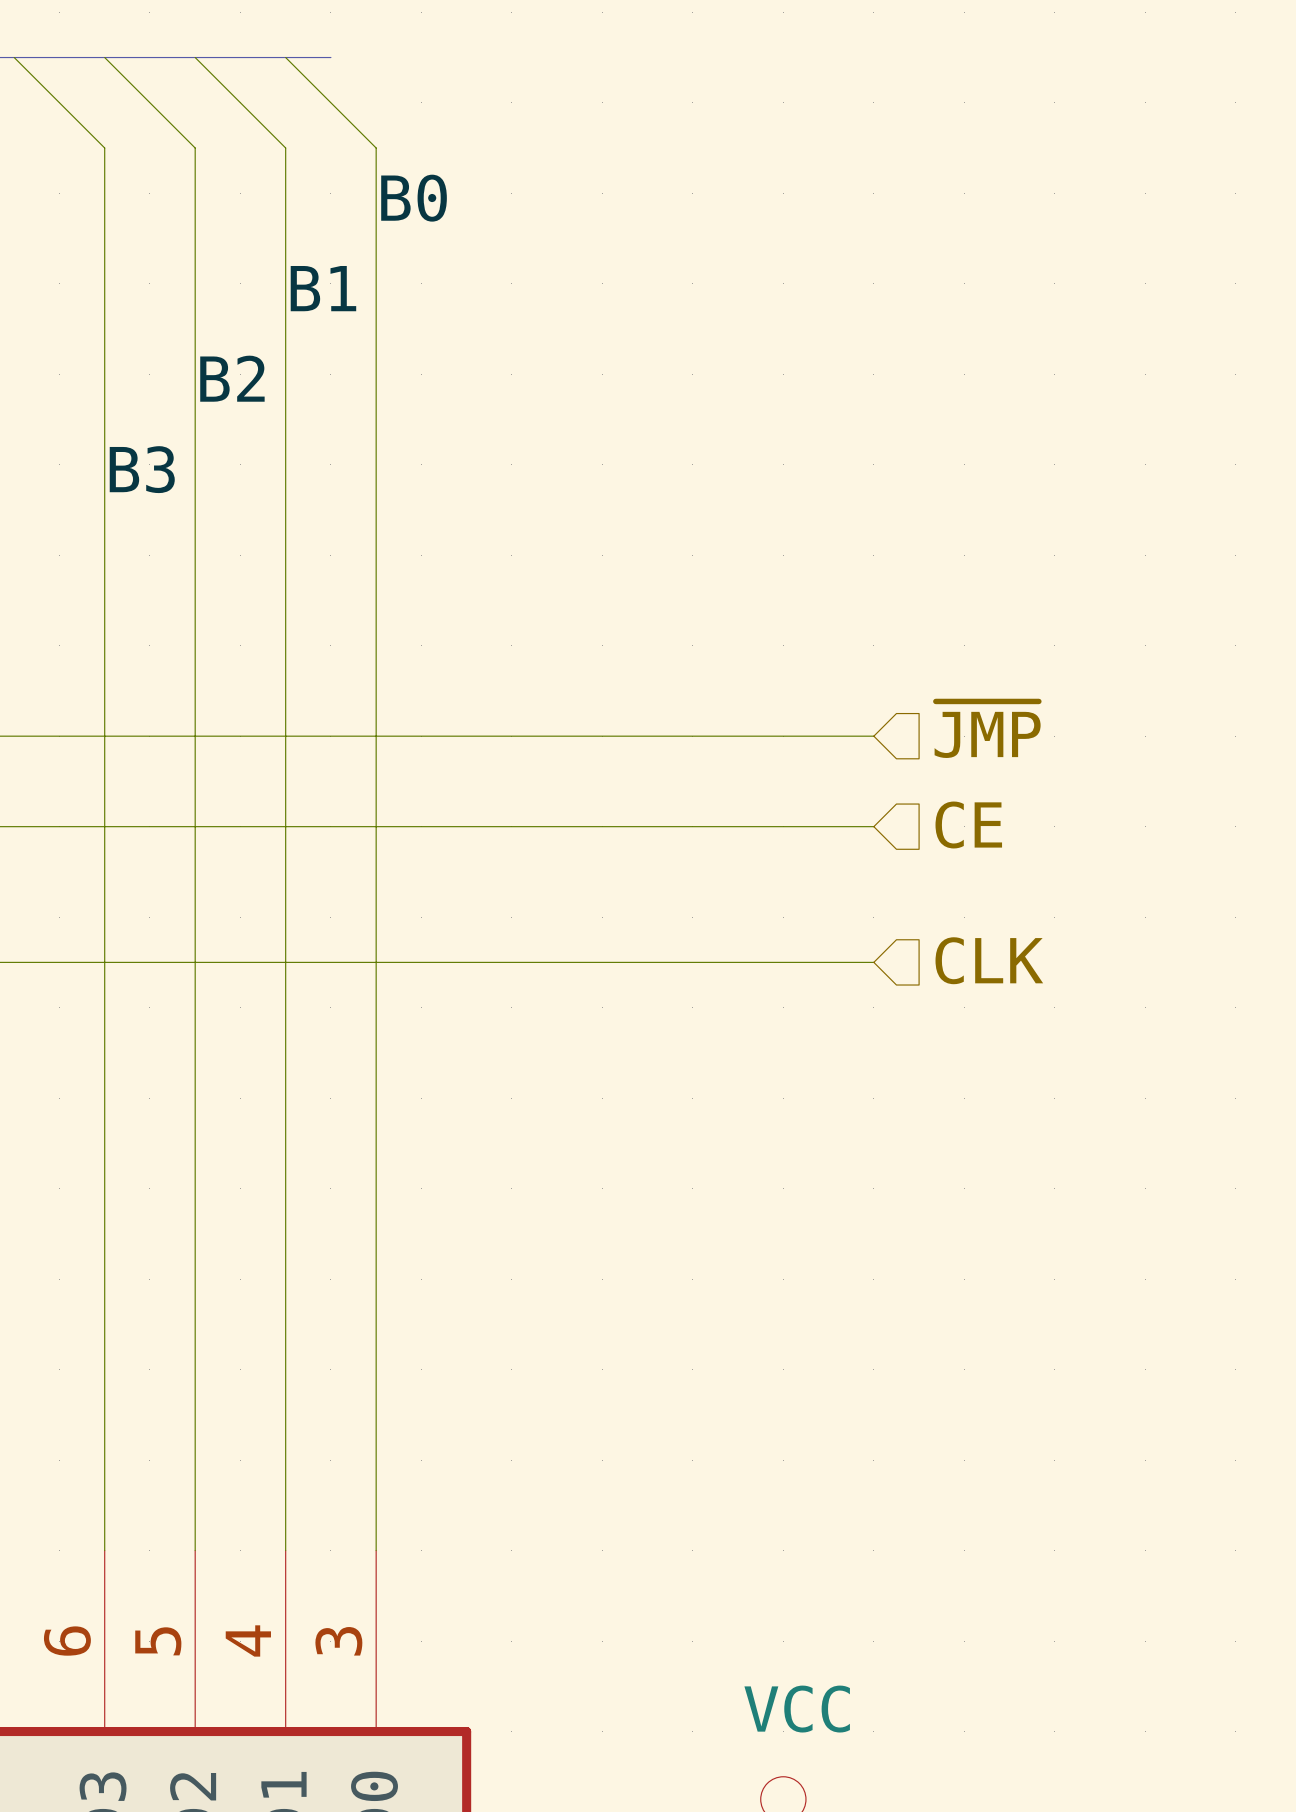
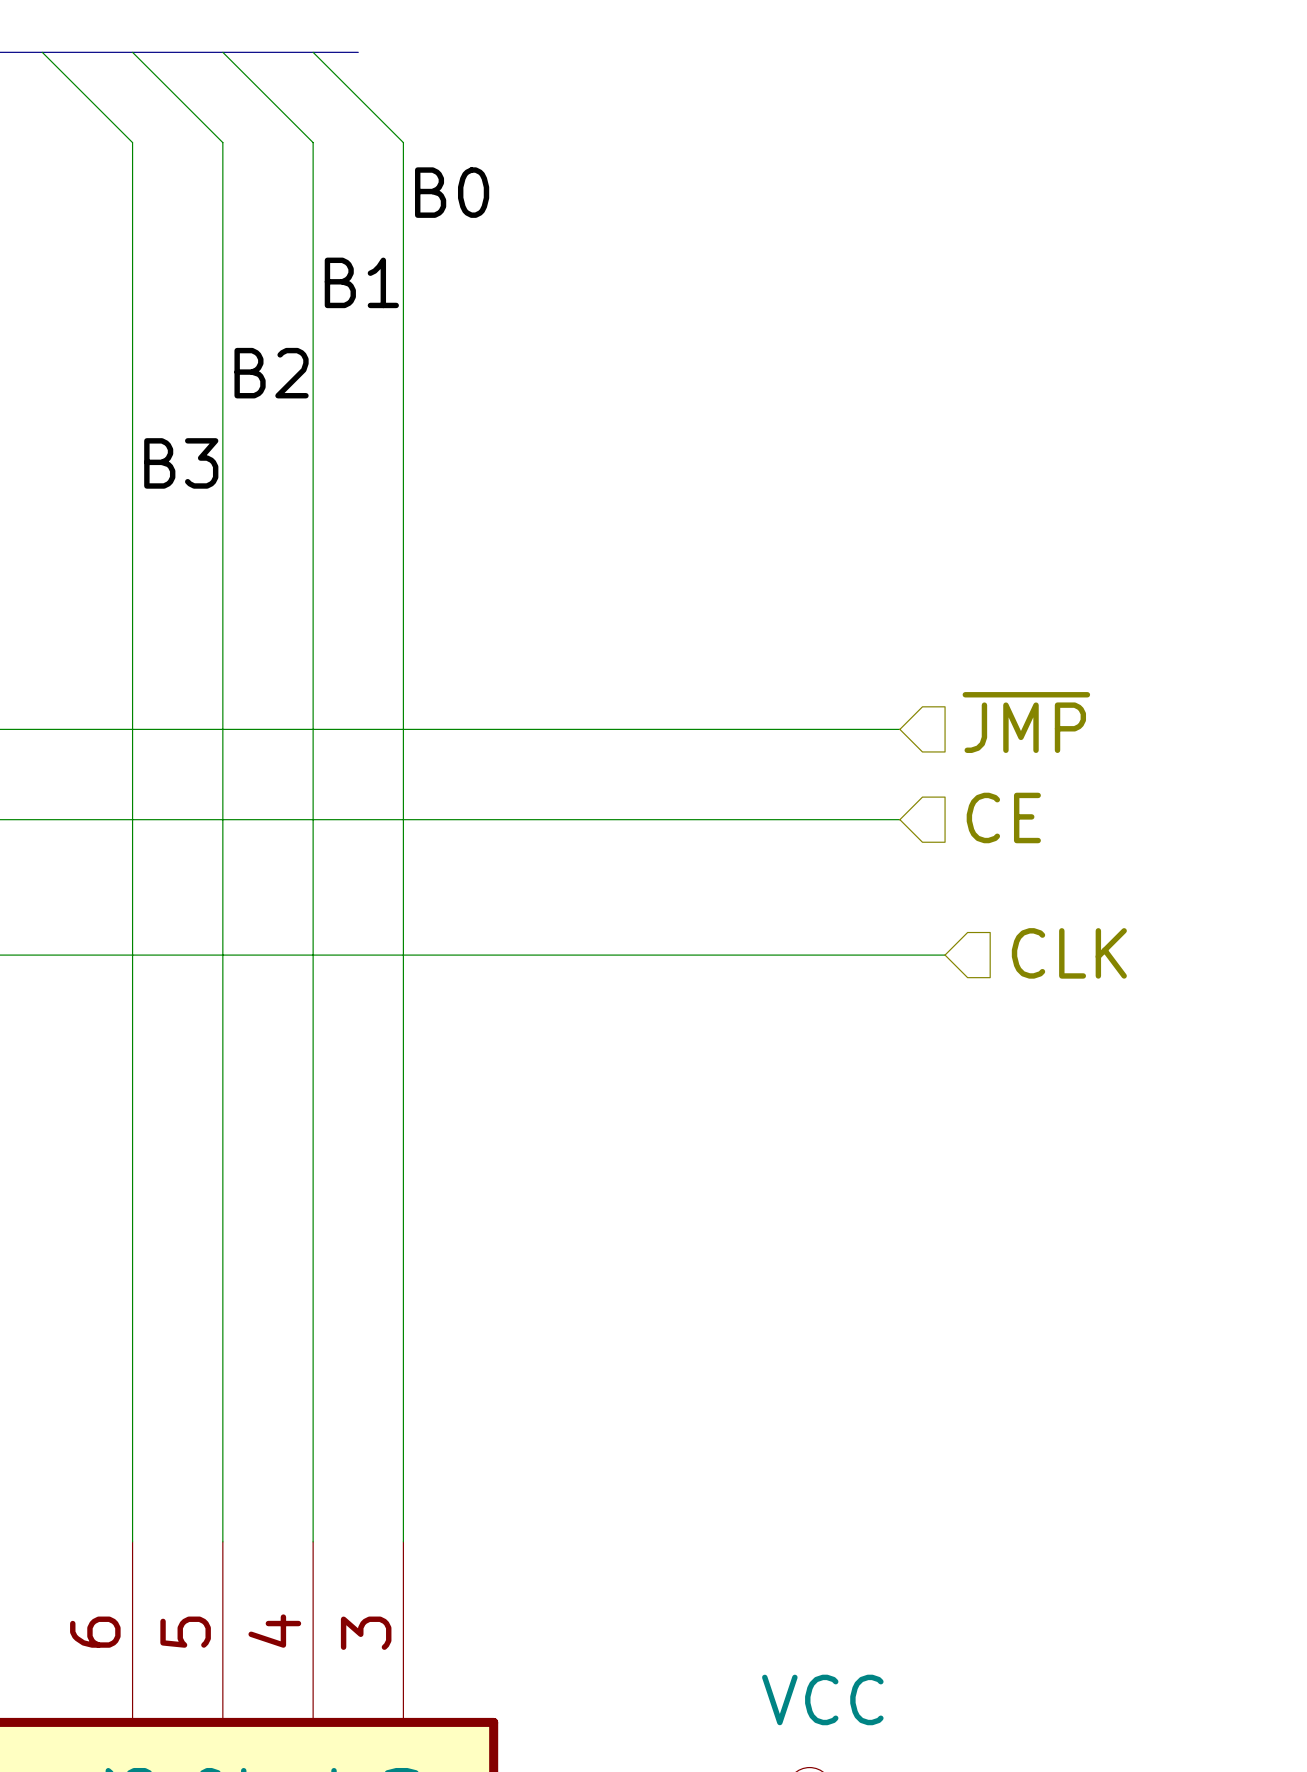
hierarchical label position: CLK (989, 960) -> CLK (1069, 953)
wire: none -> (899, 955) (945, 955)

